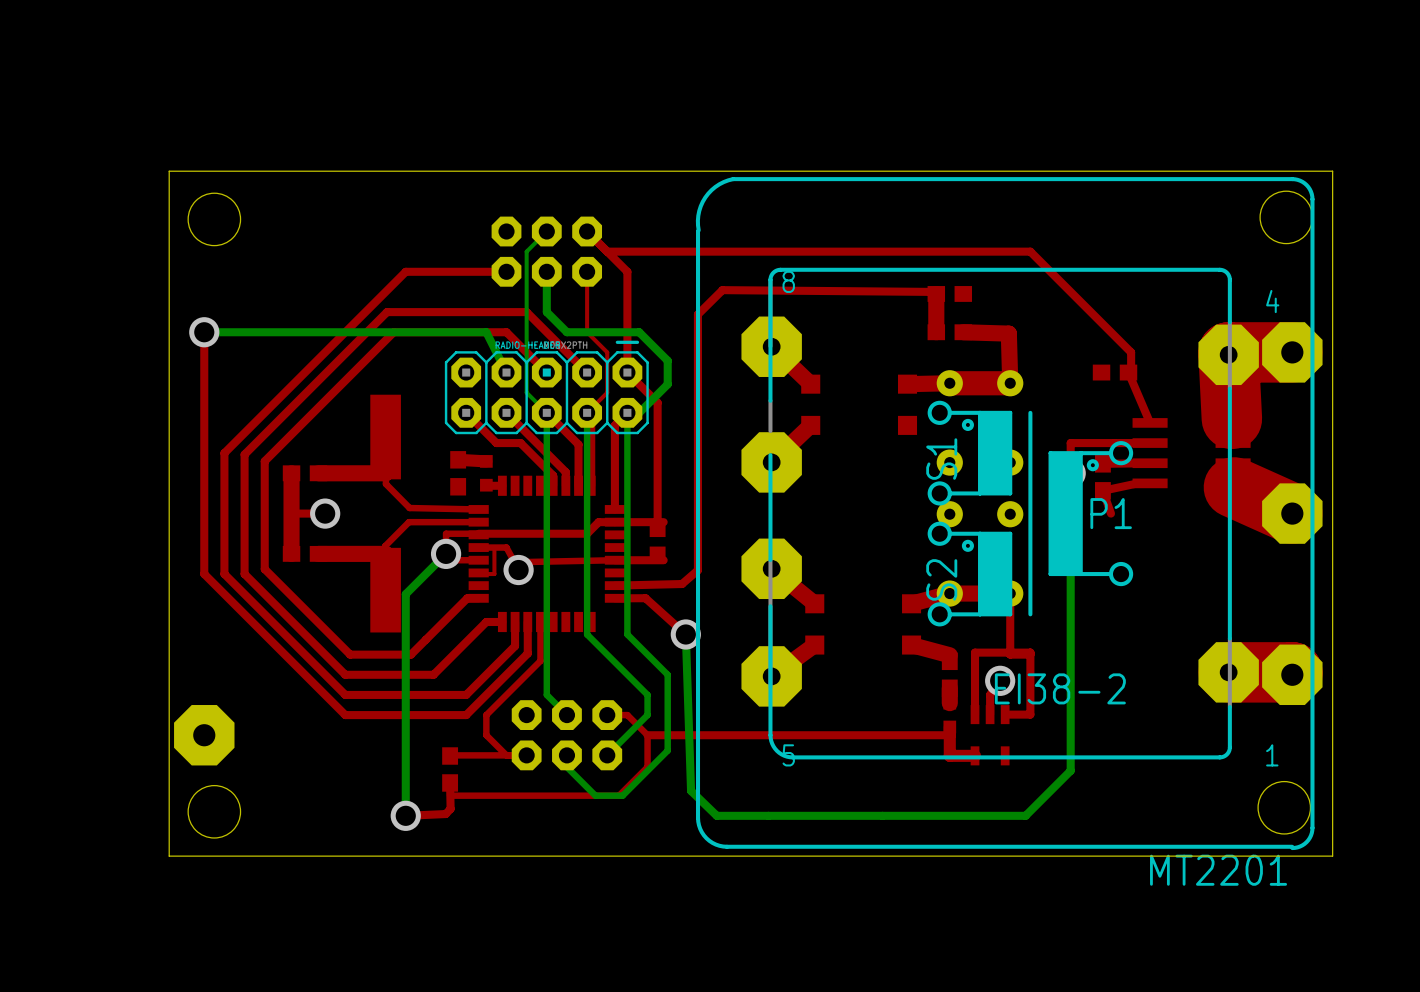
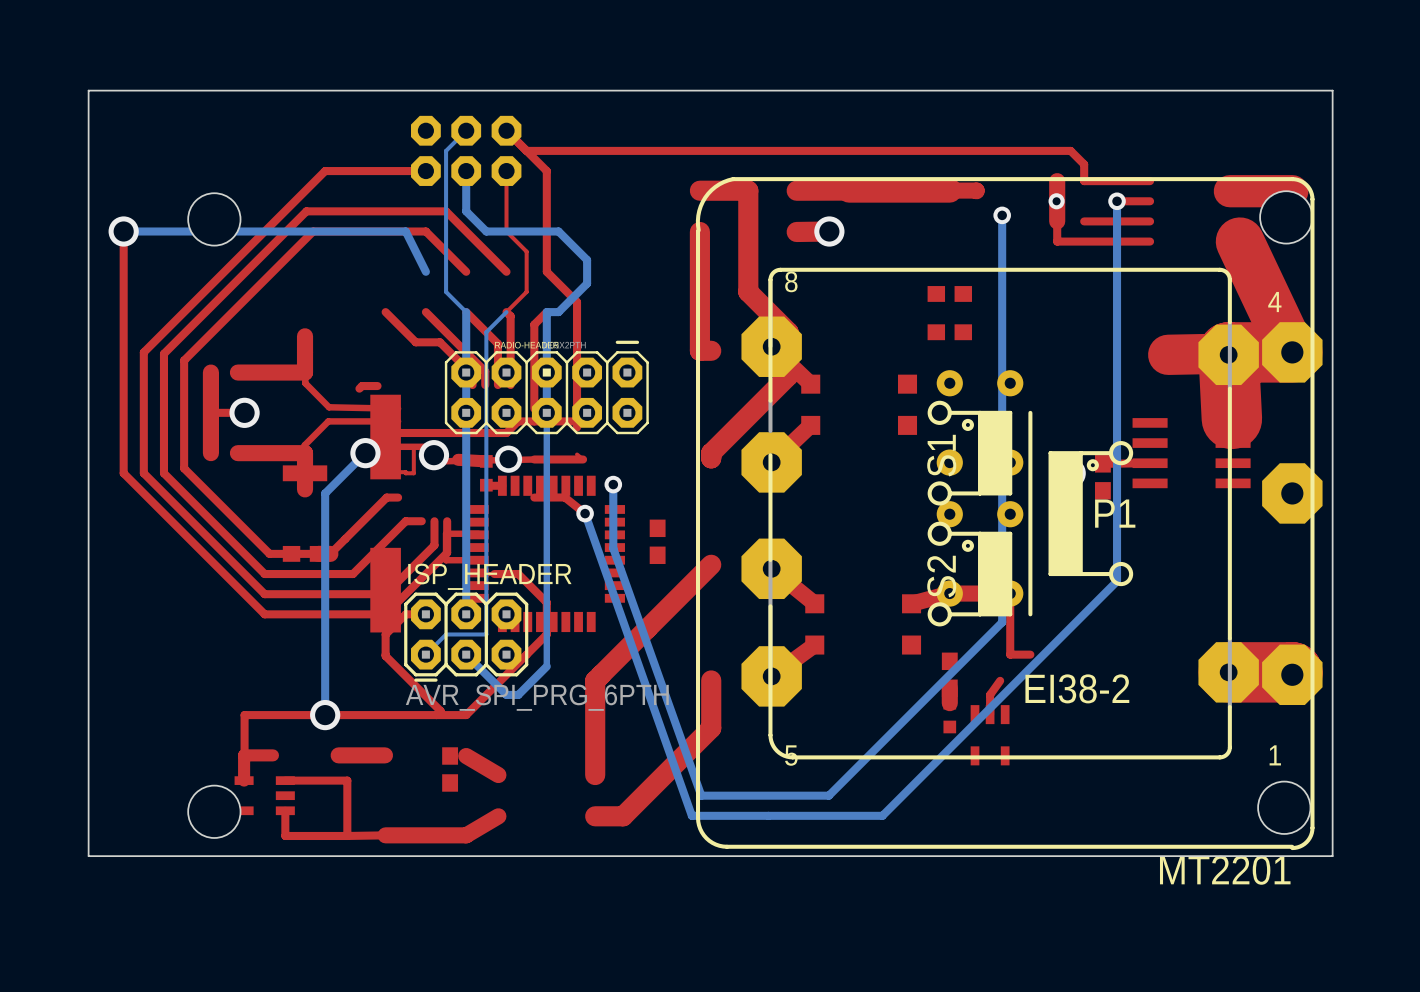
bottom track: none -> (466, 130) (446, 150) (446, 291) (466, 312) (466, 614)
top track: none -> (526, 150) (1070, 150) (1084, 164) (1084, 181) (1150, 181)
board edge: (1332, 171) (169, 171) (169, 856) -> (1332, 171) (1332, 90) (88, 90) (88, 856) (169, 856)
top track: none -> (699, 190) (748, 190) (748, 291) (788, 332) (788, 375) (711, 453) (711, 458)
top track: none -> (796, 190) (976, 191)
top track: none -> (1292, 191) (1229, 191) (1233, 181) (1233, 201)
top track: none -> (1056, 201) (1057, 181) (1057, 241) (1150, 241)
via: none -> (1056, 201)
via: none -> (1117, 201)
top track: none -> (1150, 201) (1117, 201)
bottom track: none -> (1002, 215) (1002, 622) (828, 795) (701, 795) (613, 548) (613, 484)
via: none -> (1002, 215)
top track: none -> (1150, 221) (1084, 221)
top track: none -> (1233, 221) (1233, 241) (1239, 241) (1292, 352) (1168, 354)
top track: none -> (123, 231) (123, 473) (224, 574)
via: none -> (123, 231)
bottom track: (546, 231) (526, 251) (526, 392) (546, 412) -> (466, 171) (466, 211) (486, 231) (558, 231) (587, 260) (587, 283) (558, 312) (546, 312) (546, 412)
top track: (587, 231) (627, 271) (627, 372) (657, 402) (657, 528) (663, 522) -> (506, 130) (546, 171) (546, 271) (577, 302) (577, 427) (583, 421)
top track: none -> (699, 231) (699, 350) (711, 350)
top track: none -> (829, 231) (796, 231)
via: none -> (829, 231)
part position: (546, 251) -> (466, 150)
top track: (607, 251) (1030, 251) (1131, 352) (1131, 372) (1128, 372) (1150, 422) -> none
top track: none -> (466, 271) (425, 231) (313, 231) (184, 360) (184, 468) (269, 553) (318, 553)
top track: (506, 271) (405, 271) (224, 453) (224, 574) -> (506, 271) (446, 211) (306, 211) (163, 353) (163, 473) (264, 574) (352, 574) (405, 521) (421, 521)
bottom track: (546, 271) (546, 312) (566, 332) (639, 332) (667, 360) (667, 384) (639, 412) (627, 412) (627, 634) (667, 674) (667, 750) (622, 795) (595, 795) (566, 767) (566, 755) -> none
top track: (587, 271) (587, 332) (607, 352) (607, 392) (587, 412) (591, 416) (591, 485) -> (506, 171) (506, 231) (526, 251) (526, 291) (506, 312) (510, 316) (510, 385)
top track: (929, 291) (936, 293) (936, 332) -> none
top track: (937, 291) (722, 290) (697, 314) (697, 570) (682, 584) (614, 585) -> none
bottom track: none -> (506, 312) (486, 332) (486, 634) (446, 634) (425, 654)
top track: (204, 332) (204, 574) (345, 715) -> (244, 755) (244, 715) (345, 715)
bottom track: (204, 332) (486, 332) (506, 372) -> (123, 231) (405, 231) (425, 271)
via: (204, 332) -> none
top track: (963, 332) (1008, 333) (1010, 383) (907, 384) -> none
top track: (546, 372) (506, 332) (393, 332) (264, 461) (264, 569) (350, 654) (411, 654) (467, 598) (478, 598) -> none
top track: (587, 372) (526, 312) (387, 312) (244, 454) (244, 574) -> (425, 171) (325, 171) (143, 352) (143, 473) (244, 574)
part: (1115, 372) -> none
top track: none -> (377, 386) (362, 386) (359, 388)
via: none -> (244, 412)
top track: (466, 412) (496, 443) (520, 443) (553, 475) (553, 485) -> (385, 312) (415, 342) (440, 342) (472, 374) (472, 385)
top track: (506, 412) (565, 472) (565, 485) -> (425, 312) (485, 371) (485, 385)
top track: (546, 412) (578, 444) (578, 485) -> (466, 312) (497, 343) (497, 385)
bottom track: (587, 412) (587, 634) (647, 694) (647, 715) (607, 755) -> none
top track: (627, 412) (614, 425) (614, 509) -> (546, 312) (534, 324) (534, 408)
top track: none -> (398, 421) (328, 421) (304, 445) (305, 489) (305, 453) (237, 453)
top track: (1150, 443) (1070, 443) (1070, 473) -> none
via: none -> (365, 453)
top track: none -> (577, 454) (583, 459) (433, 461) (433, 455) (425, 446) (398, 446) (413, 446) (413, 473) (398, 472)
via: none -> (433, 455)
via: none -> (508, 459)
top track: (318, 473) (385, 473) (385, 437) (385, 484) (409, 508) (478, 509) -> (237, 372) (305, 372) (305, 336) (305, 383) (329, 407) (398, 408)
part: (458, 473) -> none
bottom track: (1070, 473) (1070, 770) (1025, 815) (882, 815) -> (1117, 201) (1117, 581) (882, 815)
top track: (1150, 483) (1137, 483) (1102, 490) (1110, 513) -> none
top track: (1233, 483) (1233, 487) (1292, 513) -> none
via: none -> (613, 484)
top track: none -> (534, 497) (564, 497) (585, 513)
top track: (325, 513) (290, 513) (291, 473) (291, 553) (290, 553) -> (244, 412) (210, 412) (210, 372) (210, 453) (210, 452)
via: (325, 513) -> none
via: none -> (585, 513)
part position: (1292, 513) -> (1292, 493)
top track: (478, 522) (408, 522) (385, 546) (385, 590) (385, 553) (330, 553) -> (398, 497) (386, 497) (330, 553)
top track: (663, 522) (598, 522) (587, 533) (478, 534) -> (583, 421) (518, 421) (506, 432) (398, 434)
bottom track: (446, 553) (405, 594) (405, 815) -> (365, 453) (325, 493) (325, 715)
via: (446, 553) -> none
top track: (657, 555) (663, 560) (514, 562) (518, 570) (506, 547) (478, 547) (494, 547) (494, 574) -> none
top track: none -> (711, 564) (595, 680) (595, 775)
via: (518, 570) -> none
top track: (264, 594) (345, 674) (433, 674) (486, 621) (502, 621) -> (264, 594) (385, 594) (434, 545) (434, 521)
top track: (614, 598) (645, 598) (685, 634) -> none
top track: (264, 614) (345, 694) (466, 694) (515, 646) (515, 621) -> (264, 614) (385, 614) (447, 552) (447, 521)
top track: none -> (425, 614) (405, 614) (385, 634) (385, 656) (440, 711) (436, 715)
top track: (527, 621) (527, 653) -> (494, 574) (518, 574) (546, 602) (546, 634) (527, 653)
top track: (540, 621) (540, 660) (486, 715) (486, 735) (506, 755) -> none
bottom track: (685, 634) (691, 790) (716, 815) -> (585, 513) (691, 815) (716, 815)
via: (685, 634) -> none
top track: (911, 645) (950, 655) -> none
bottom track: (546, 666) (546, 694) (566, 715) -> (546, 666) (518, 694) (506, 694) (466, 654)
top track: none -> (711, 680) (711, 728) (623, 816) (595, 816)
via: (1000, 680) -> none
top track: (1005, 714) (1030, 714) (1030, 652) (975, 652) (975, 714) -> none
via: none -> (325, 715)
top track: (607, 715) (627, 715) (647, 735) -> none
top track: (949, 726) (949, 755) (975, 755) -> none
part: (204, 735) -> none
ISP_HEADER side: top (566, 735) -> bottom (466, 637)
top track: (647, 735) (647, 767) (619, 795) (450, 795) (450, 782) (450, 808) (445, 814) (405, 815) -> none
top track: (949, 735) (647, 735) -> none
top track: none -> (272, 755) (244, 755) (244, 780)
top track: none -> (338, 755) (385, 756)
top track: (526, 755) (450, 756) -> none
top track: none -> (466, 756) (498, 775)
top track: none -> (285, 780) (347, 780) (347, 835)
part: none -> (264, 795)
top track: none -> (285, 810) (285, 835) (347, 835)
via: (405, 815) -> none
top track: none -> (498, 816) (466, 835) (347, 835)

